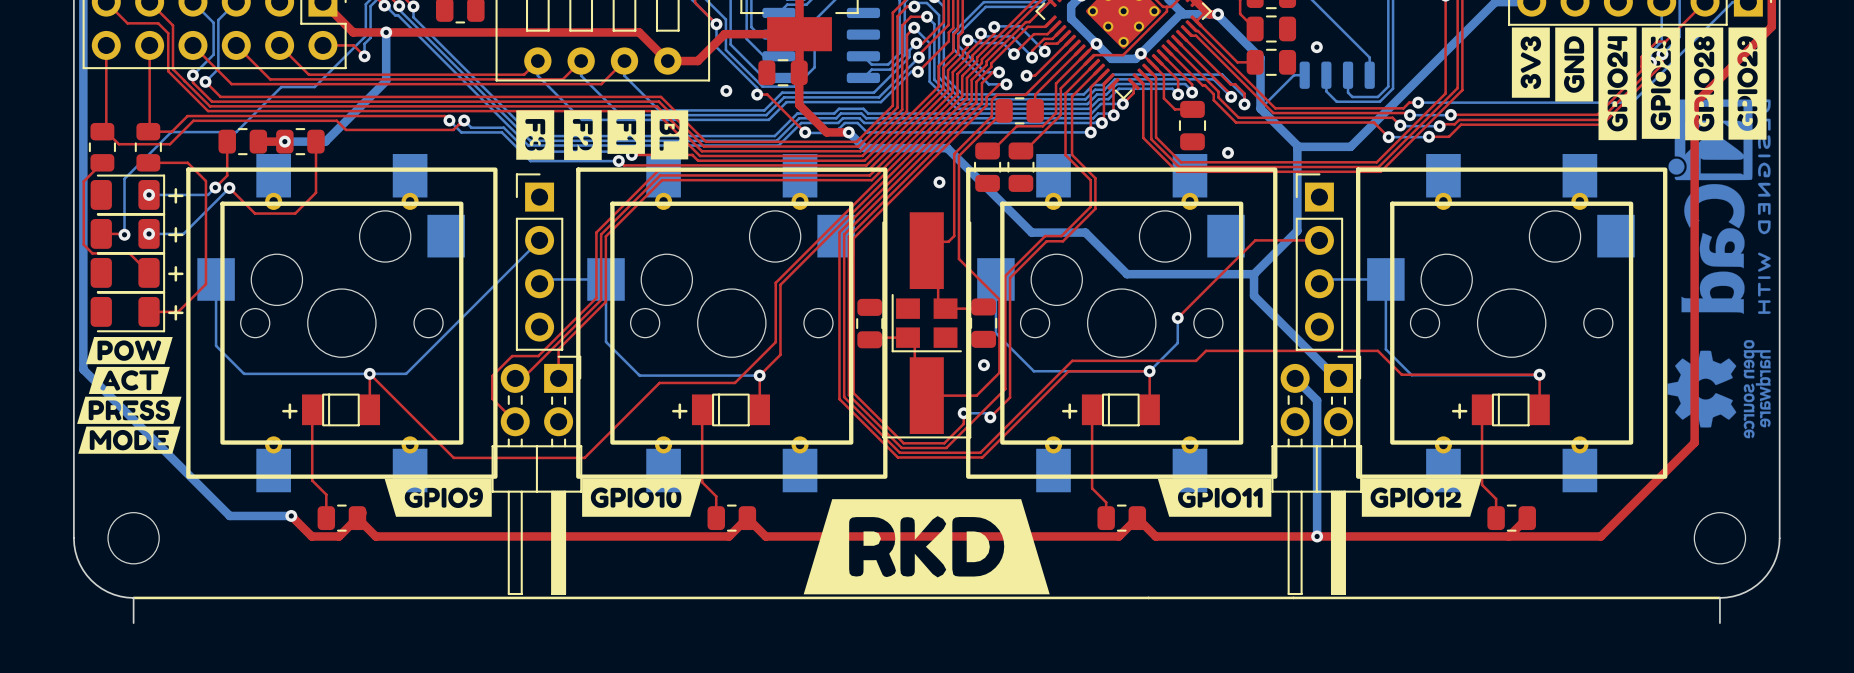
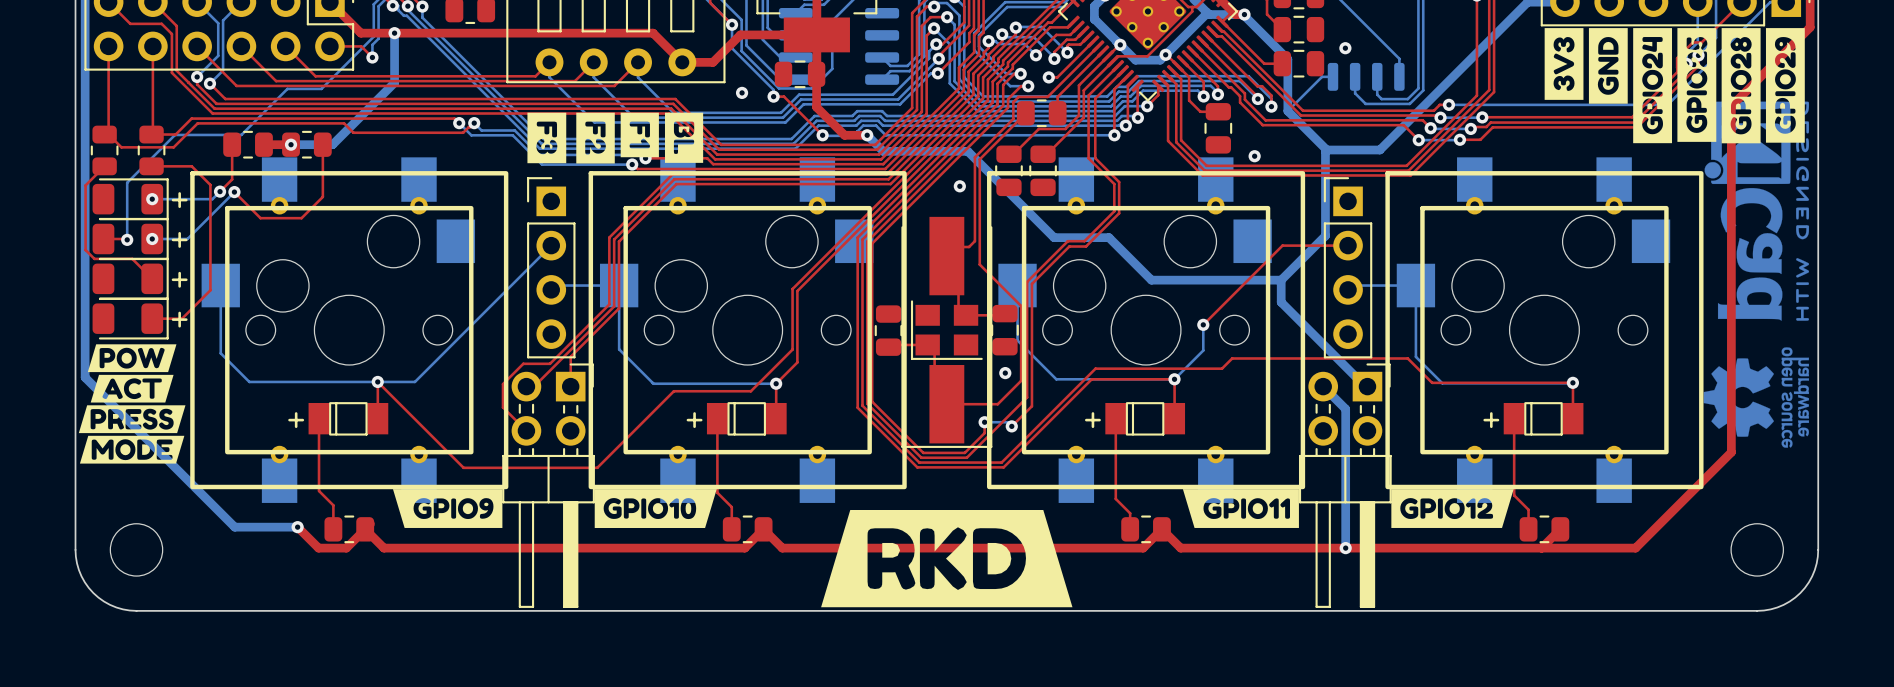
line: (133, 597) (1719, 597) -> none
board edge: (133, 597) (133, 623) -> (136, 610) (1757, 610)
board edge: (1719, 597) (1719, 623) -> none

